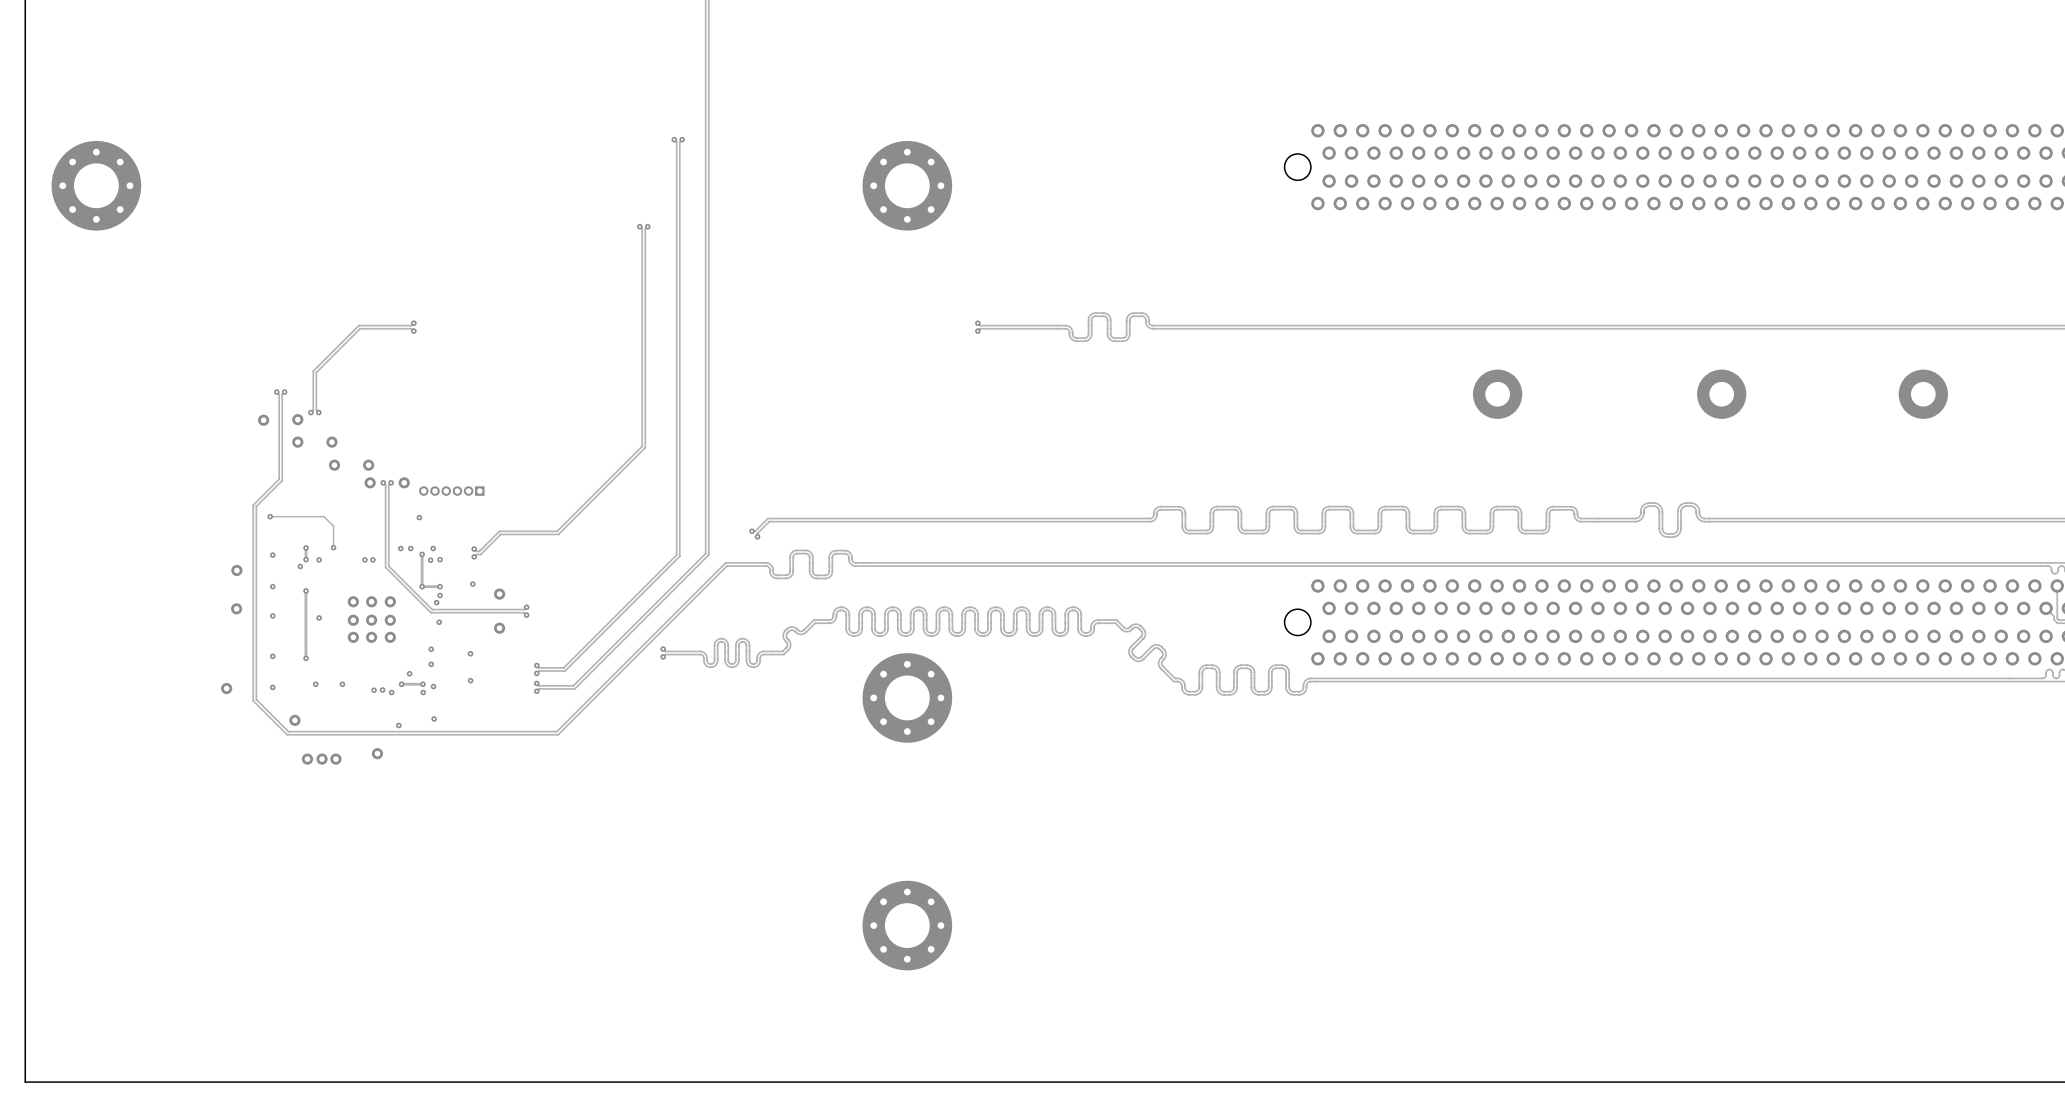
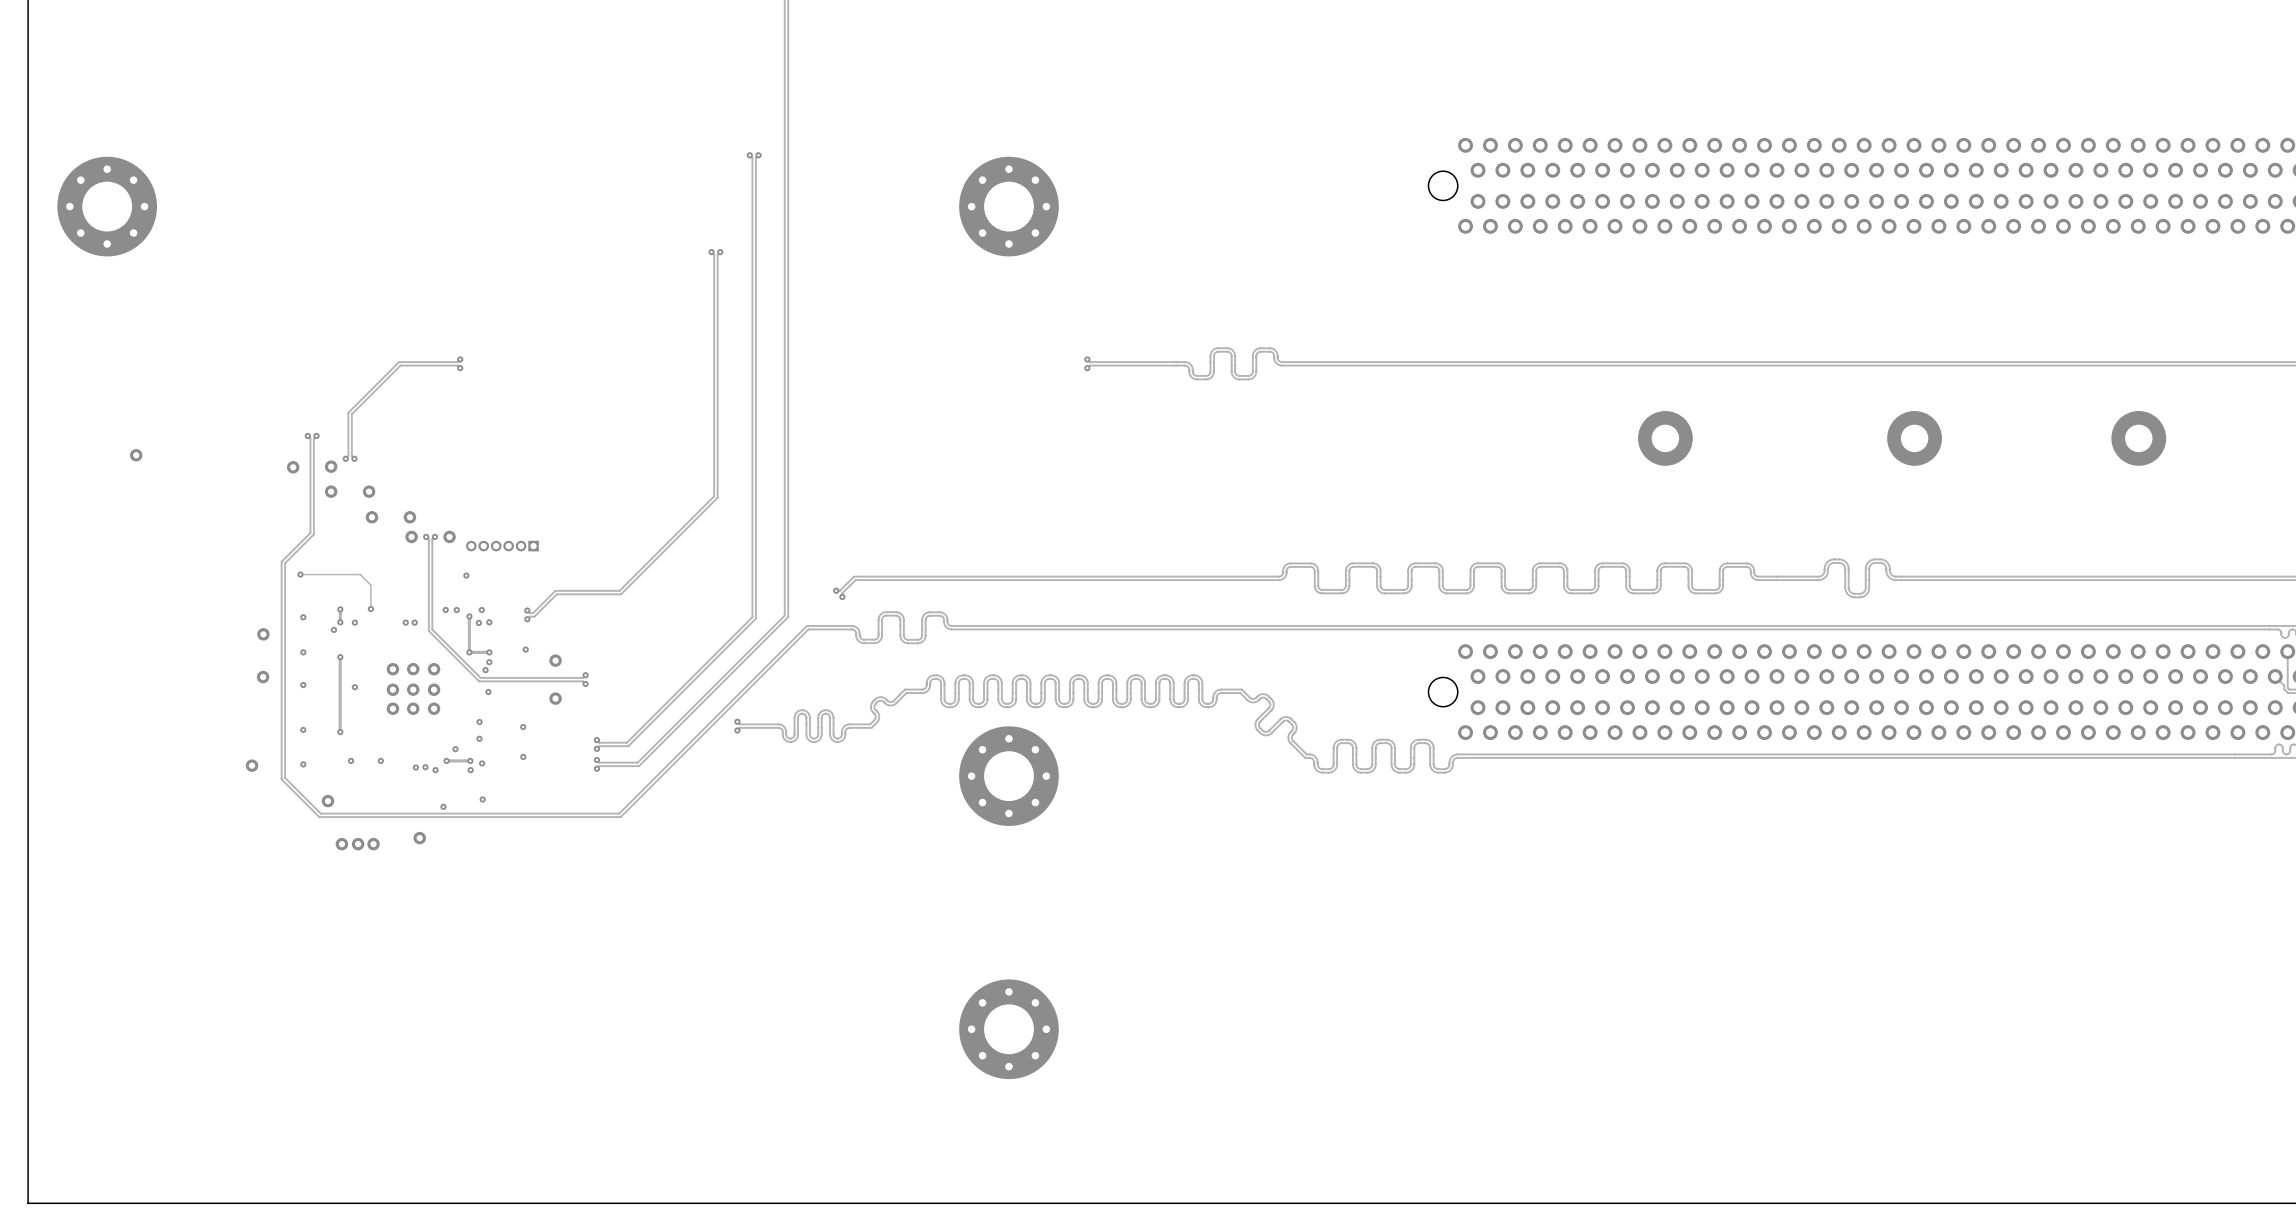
via: none -> (136, 455)

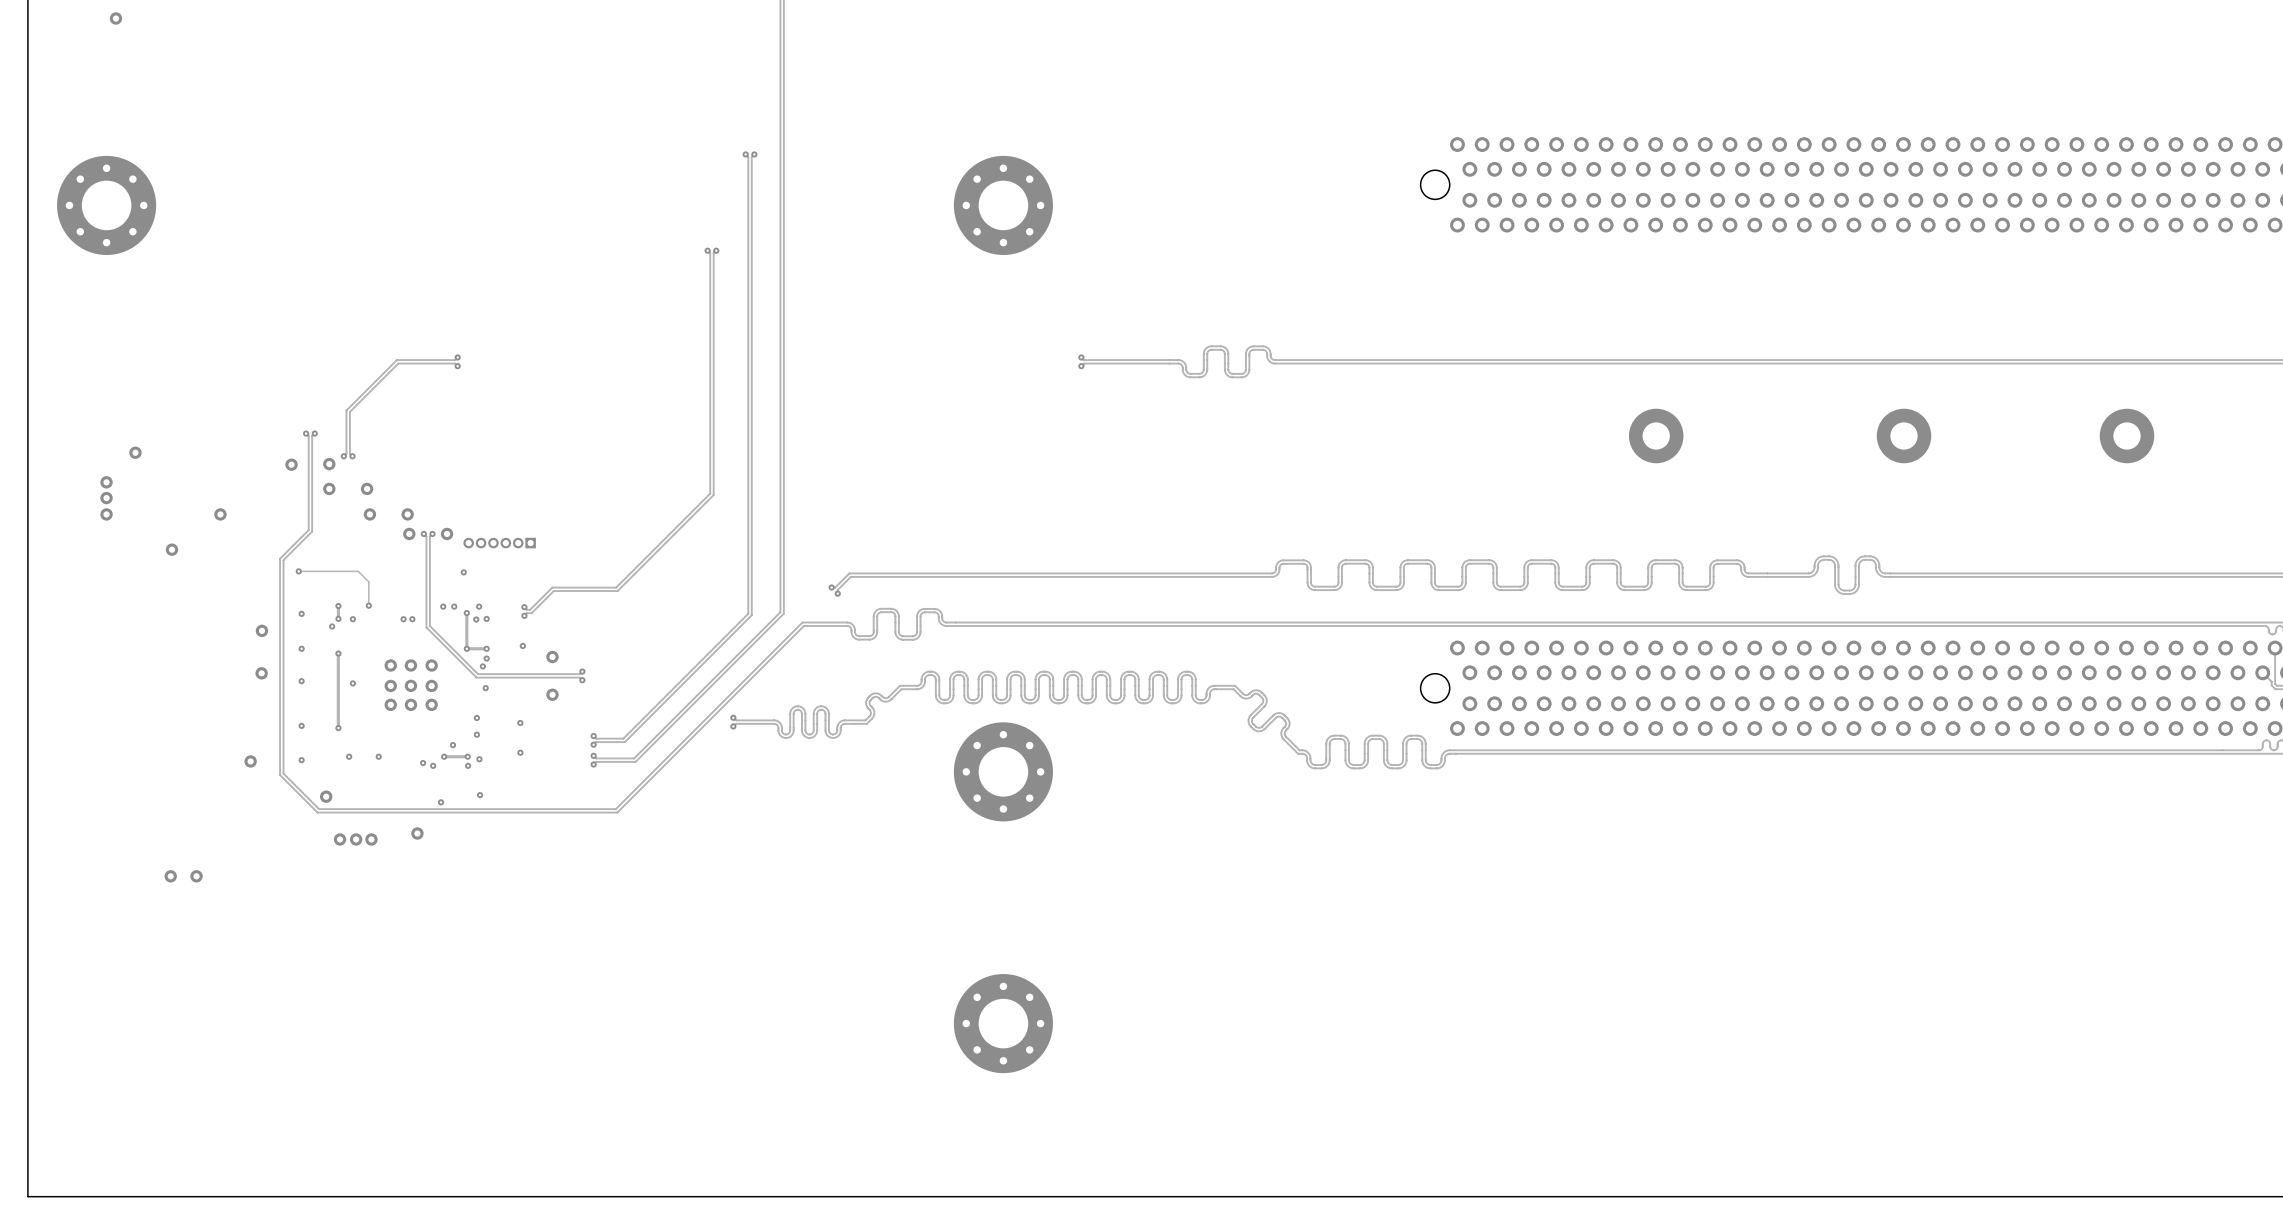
via: none -> (115, 18)
via: none -> (106, 482)
via: none -> (106, 498)
via: none -> (106, 514)
via: none -> (220, 514)
via: none -> (171, 549)
via: (415, 767) -> none
via: none -> (170, 876)
via: none -> (196, 876)

